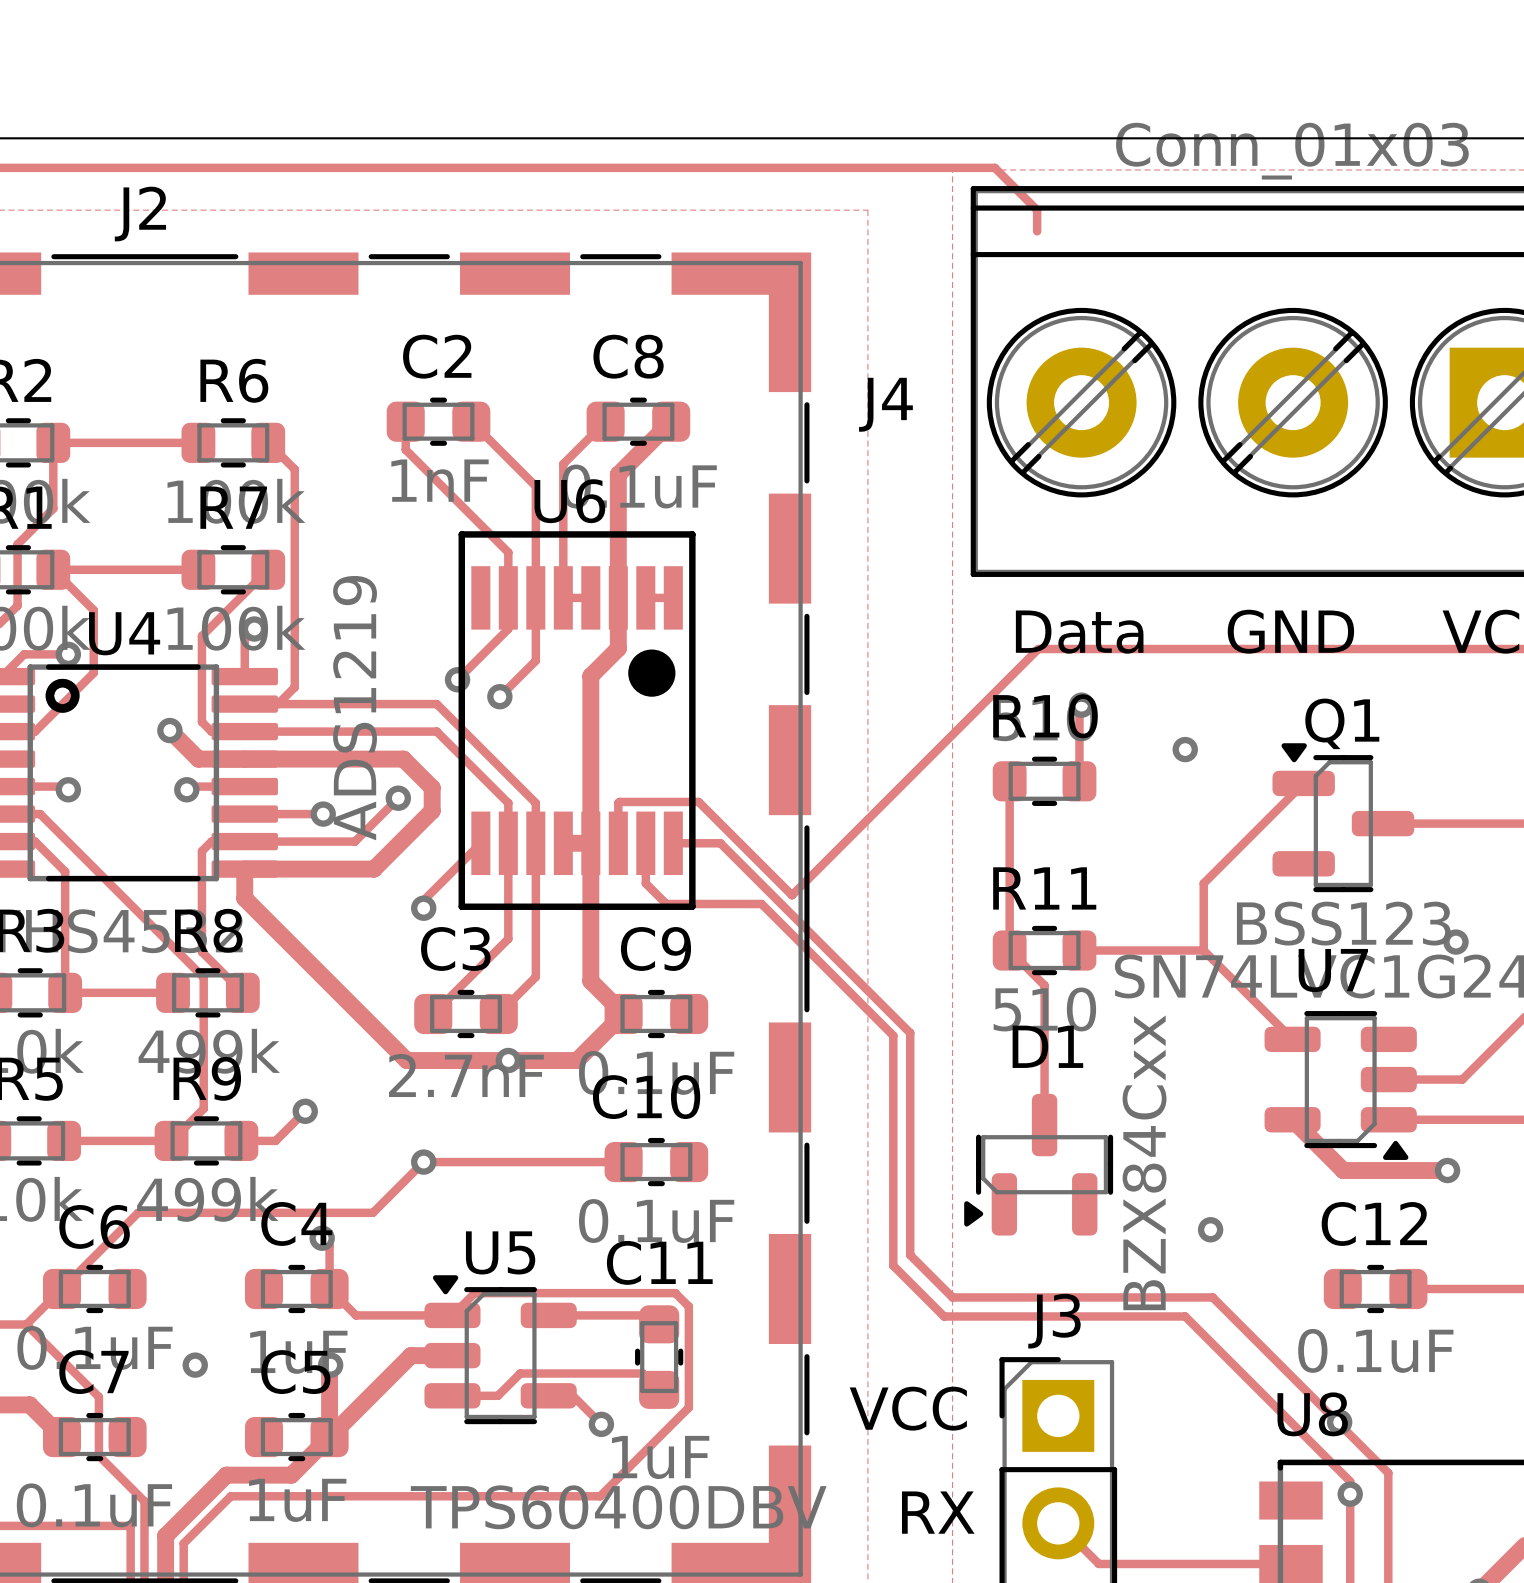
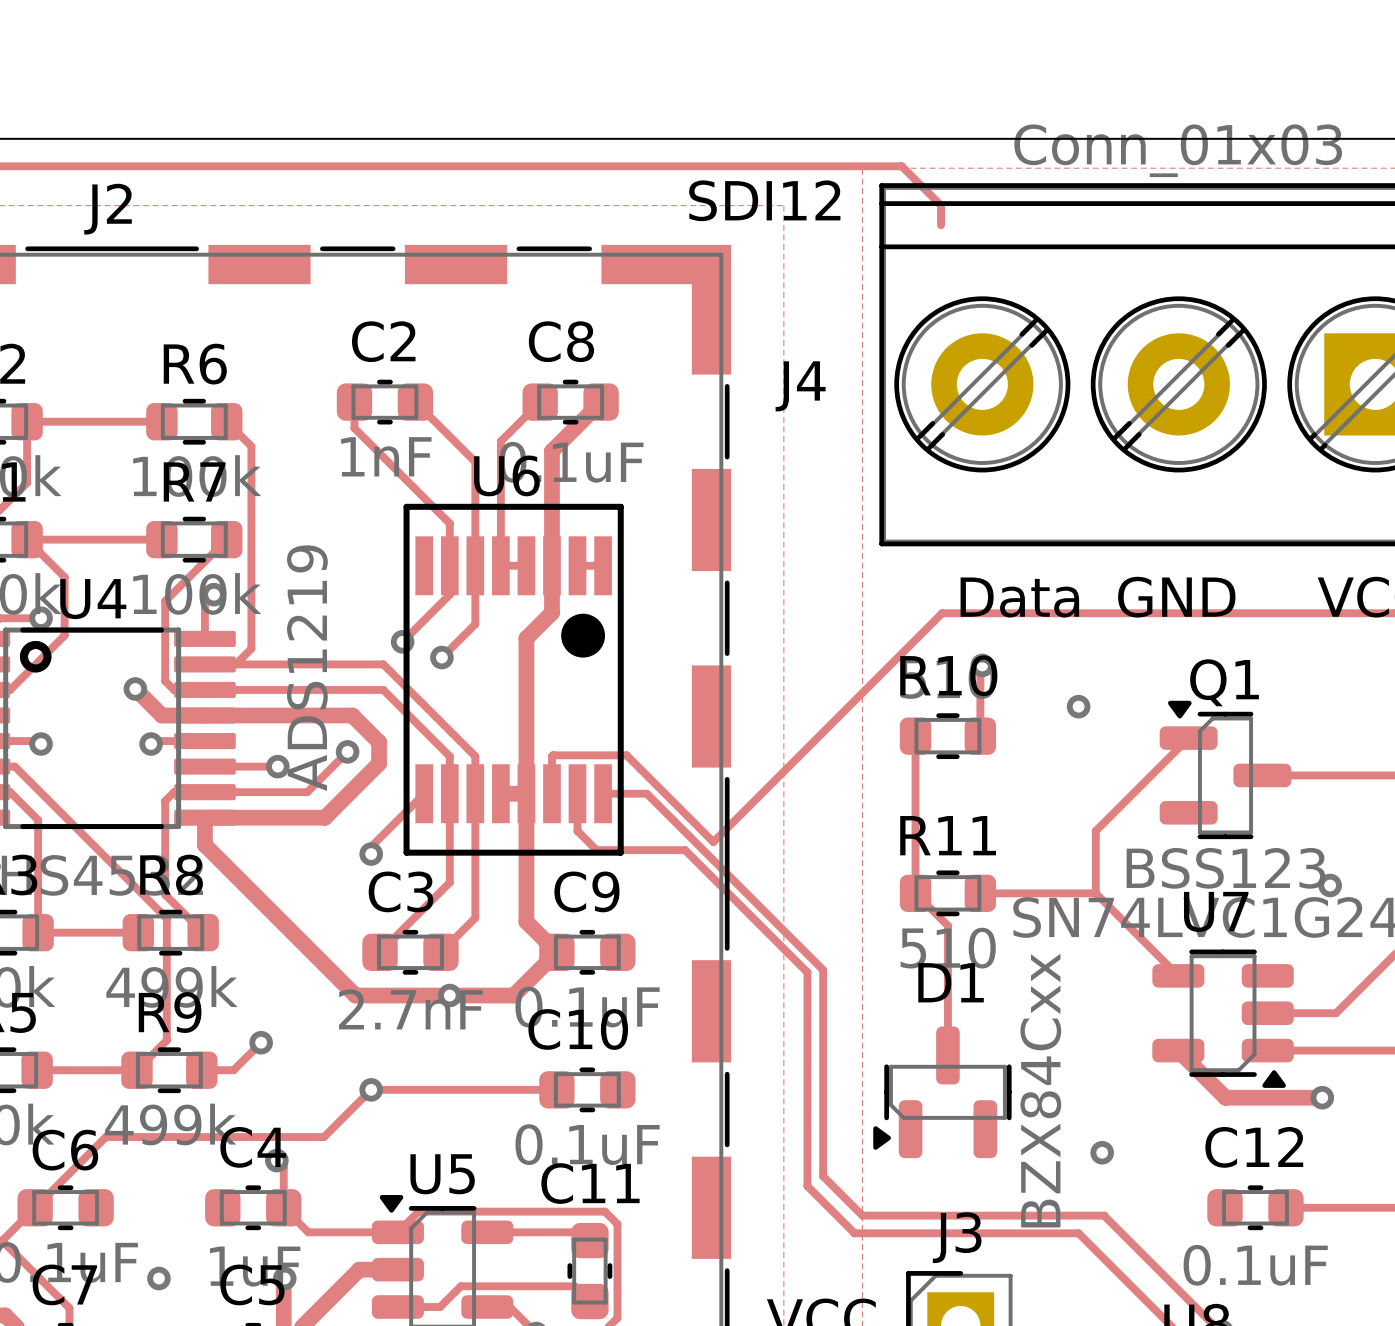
text: none -> SDI12 (764, 200)
text position: Data (1079, 632) -> Data (1019, 597)

